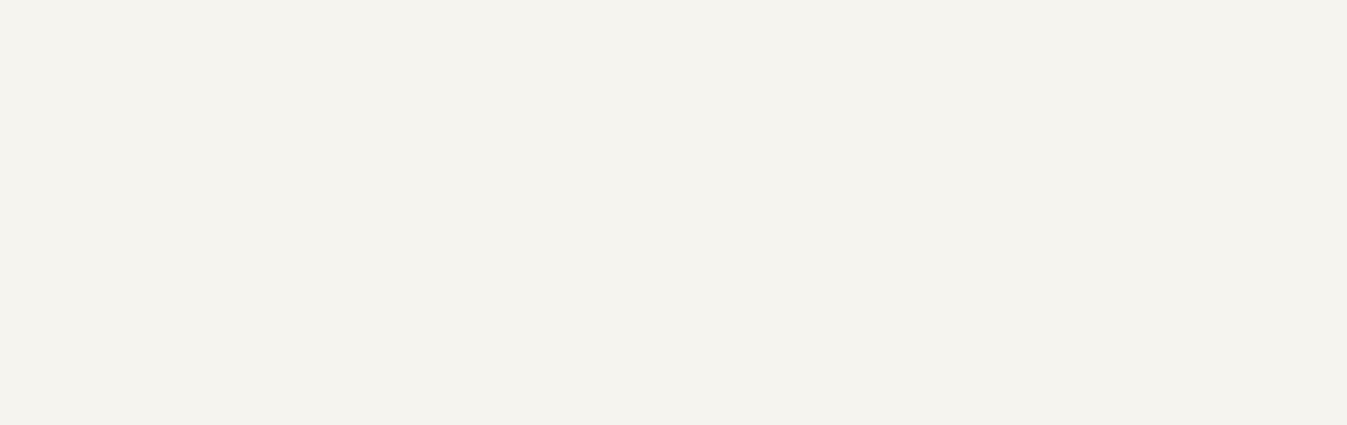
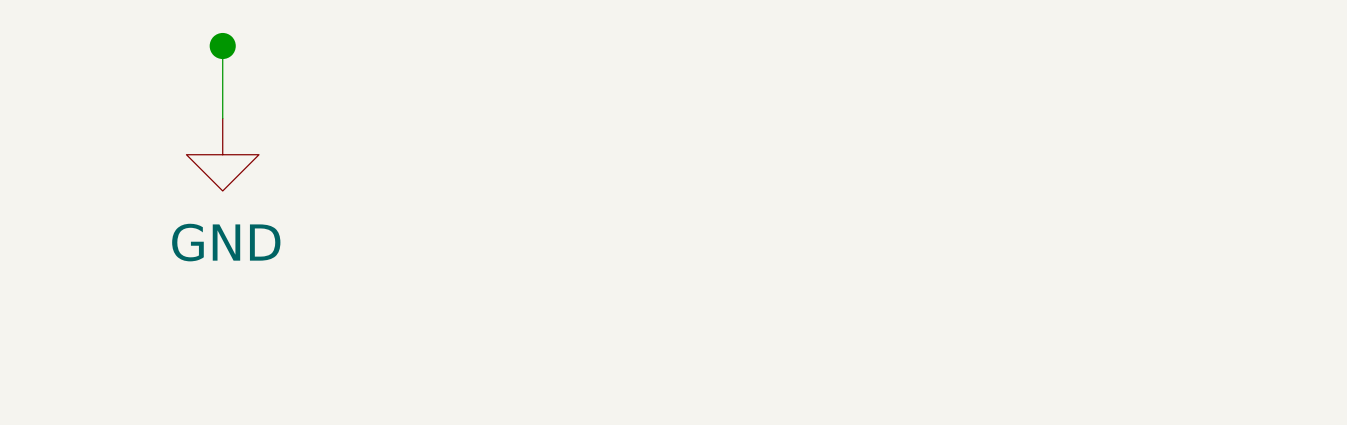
wire: none -> (222, 45) (222, 118)
junction: none -> (222, 45)
power symbol: none -> GND (222, 154)

